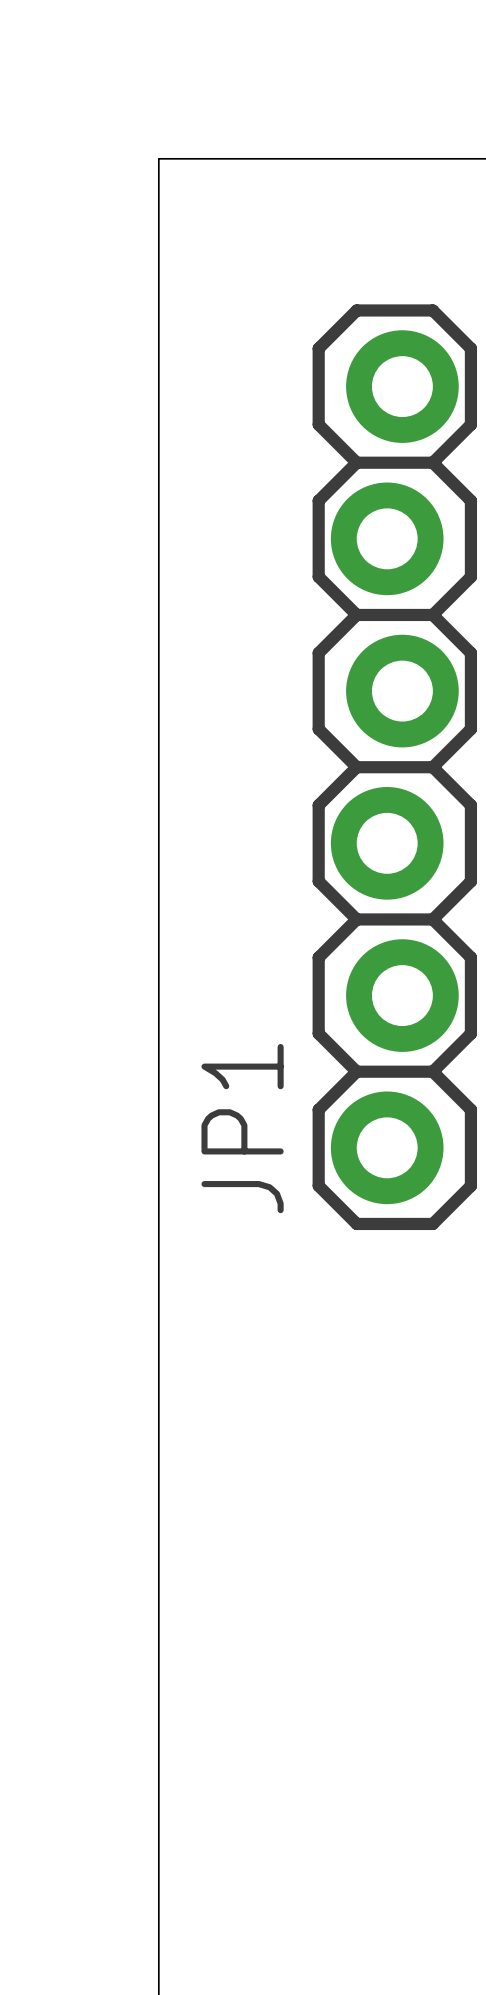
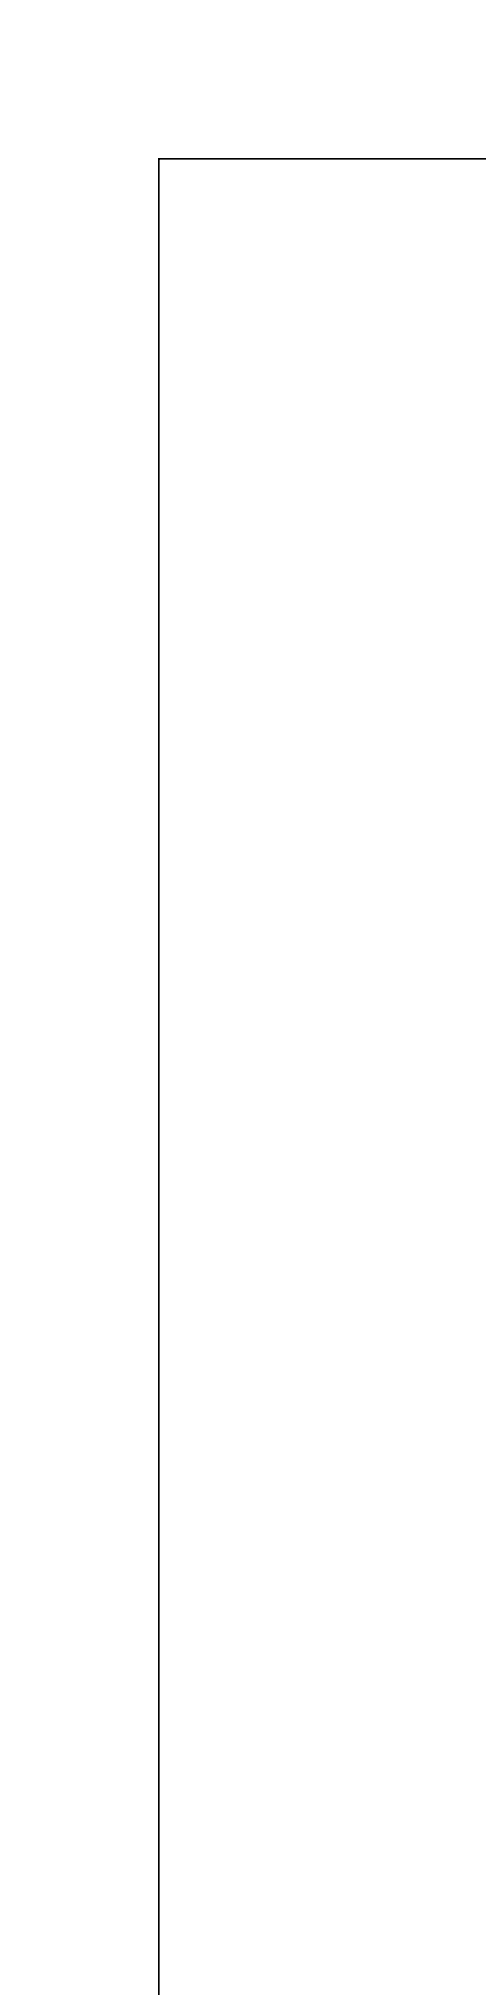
JP1: (394, 767) -> none

